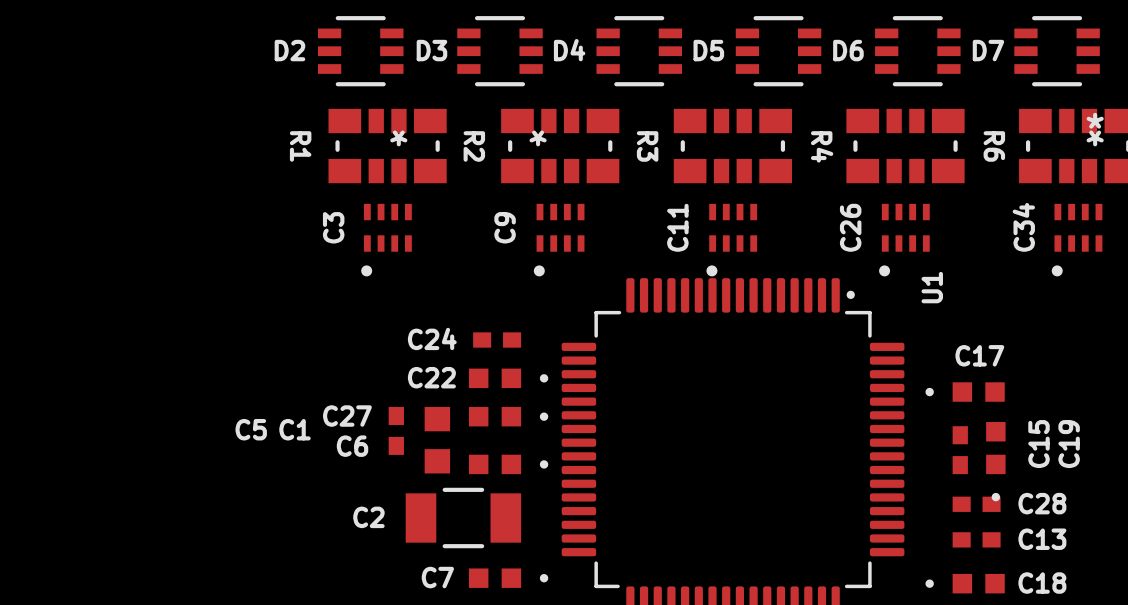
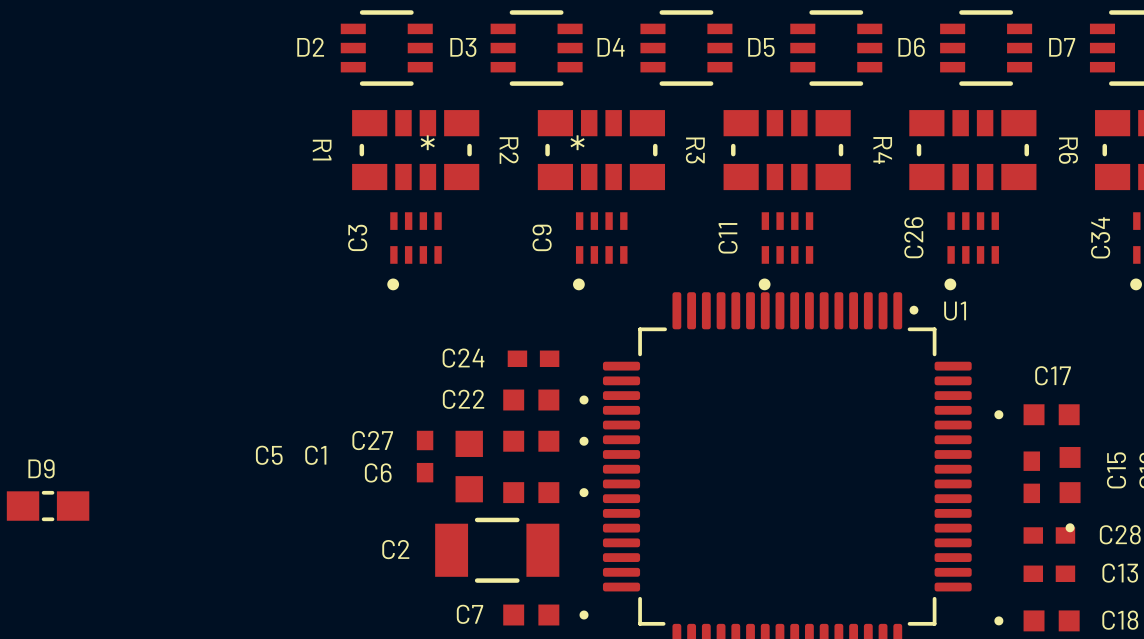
U1 name rotation: 0° (932, 287) -> 90° clockwise (955, 311)
U1 name position: U1 (932, 287) -> U1 (955, 311)
D9: none -> (48, 506)

